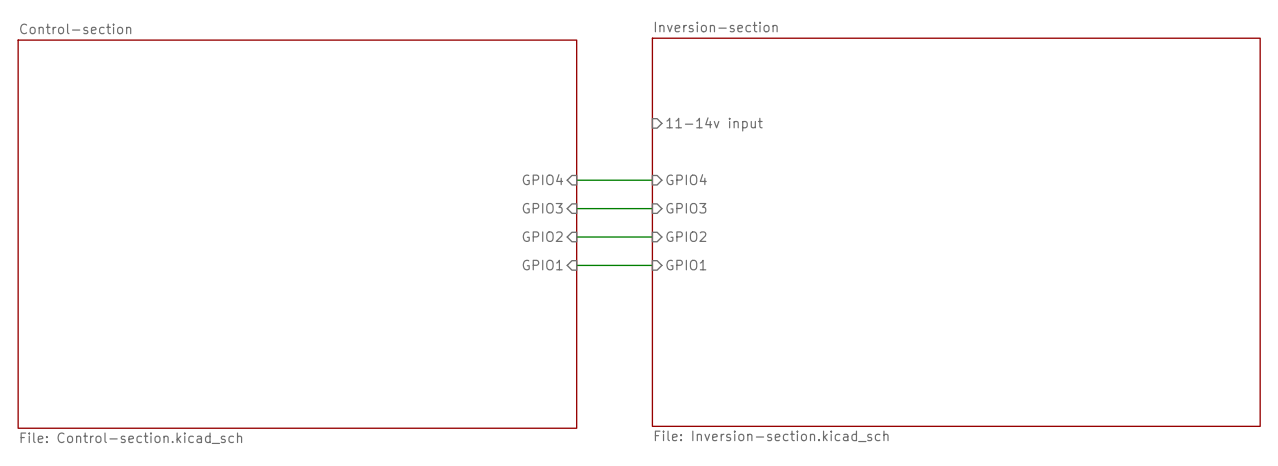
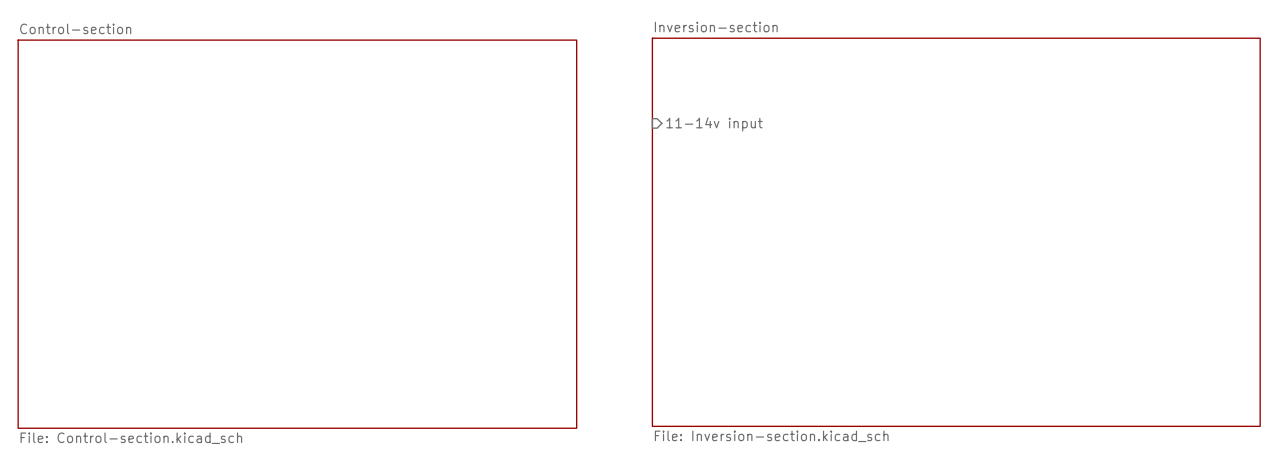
sheet pin: GPIO4 (542, 179) -> none
sheet pin: GPIO4 (686, 179) -> none
wire: (576, 180) (652, 180) -> none
sheet pin: GPIO3 (542, 208) -> none
wire: (576, 208) (652, 208) -> none
sheet pin: GPIO3 (686, 208) -> none
sheet pin: GPIO2 (542, 236) -> none
sheet pin: GPIO2 (686, 236) -> none
wire: (576, 237) (652, 237) -> none
sheet pin: GPIO1 (542, 265) -> none
wire: (576, 265) (652, 265) -> none
sheet pin: GPIO1 (686, 265) -> none

